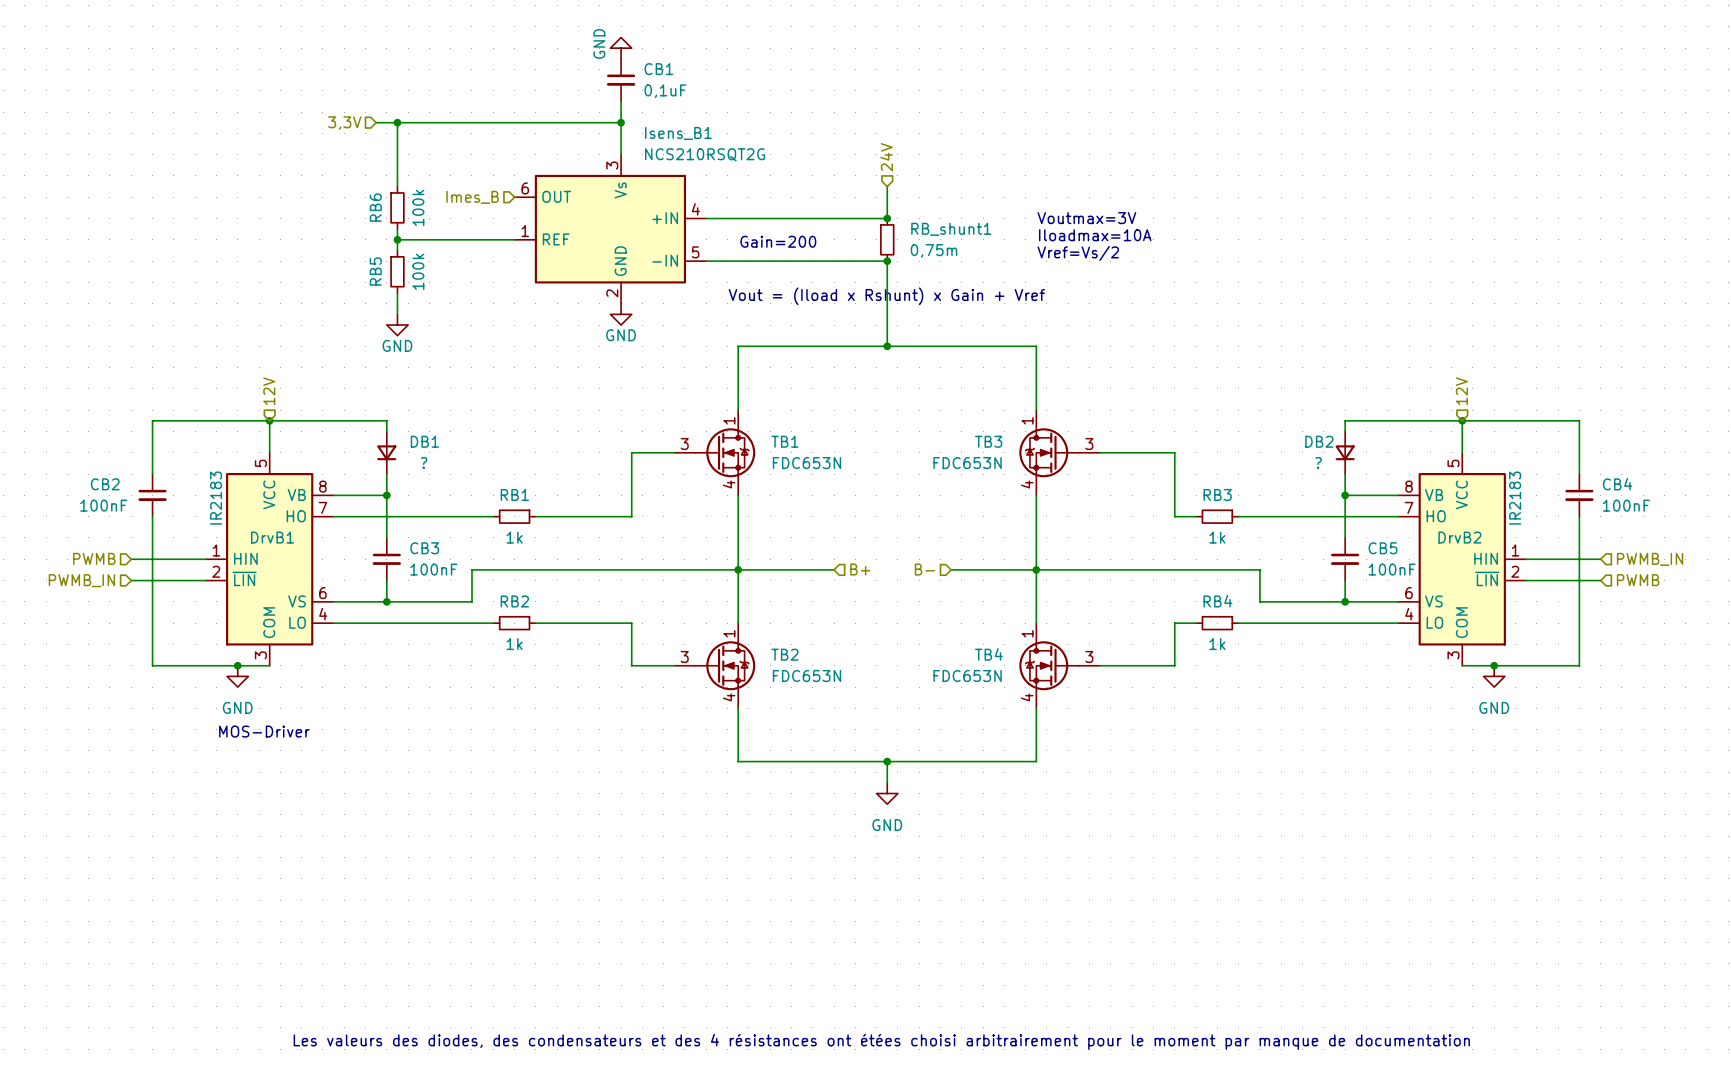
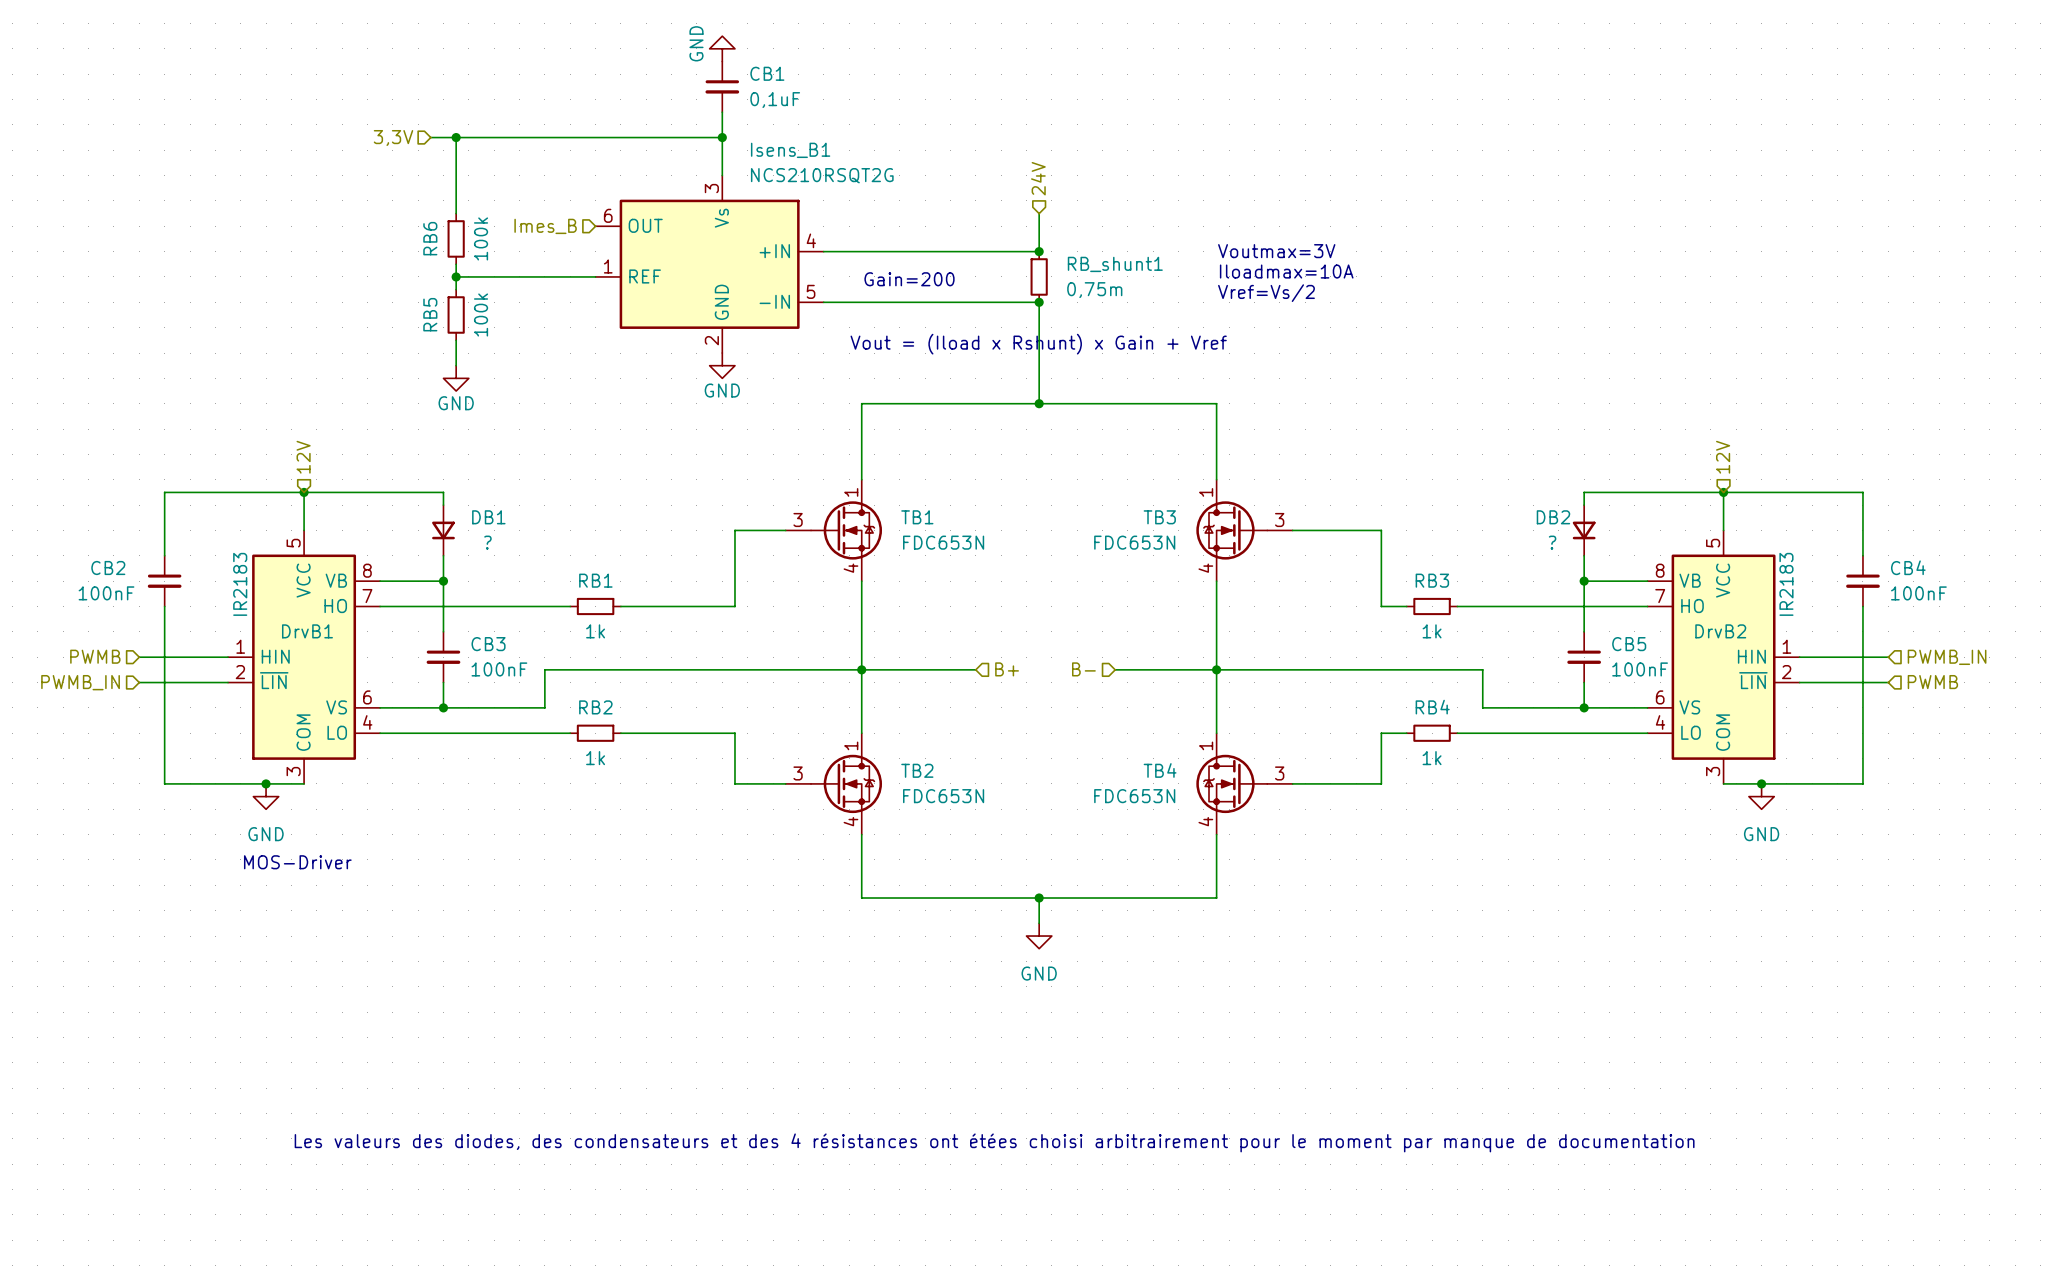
text position: Les valeurs des diodes, des condensateurs et des 4 résistances ont étées choisi arbitrairement pour le moment par manque de documentation (881, 1041) -> Les valeurs des diodes, des condensateurs et des 4 résistances ont étées choisi arbitrairement pour le moment par manque de documentation (994, 1142)

